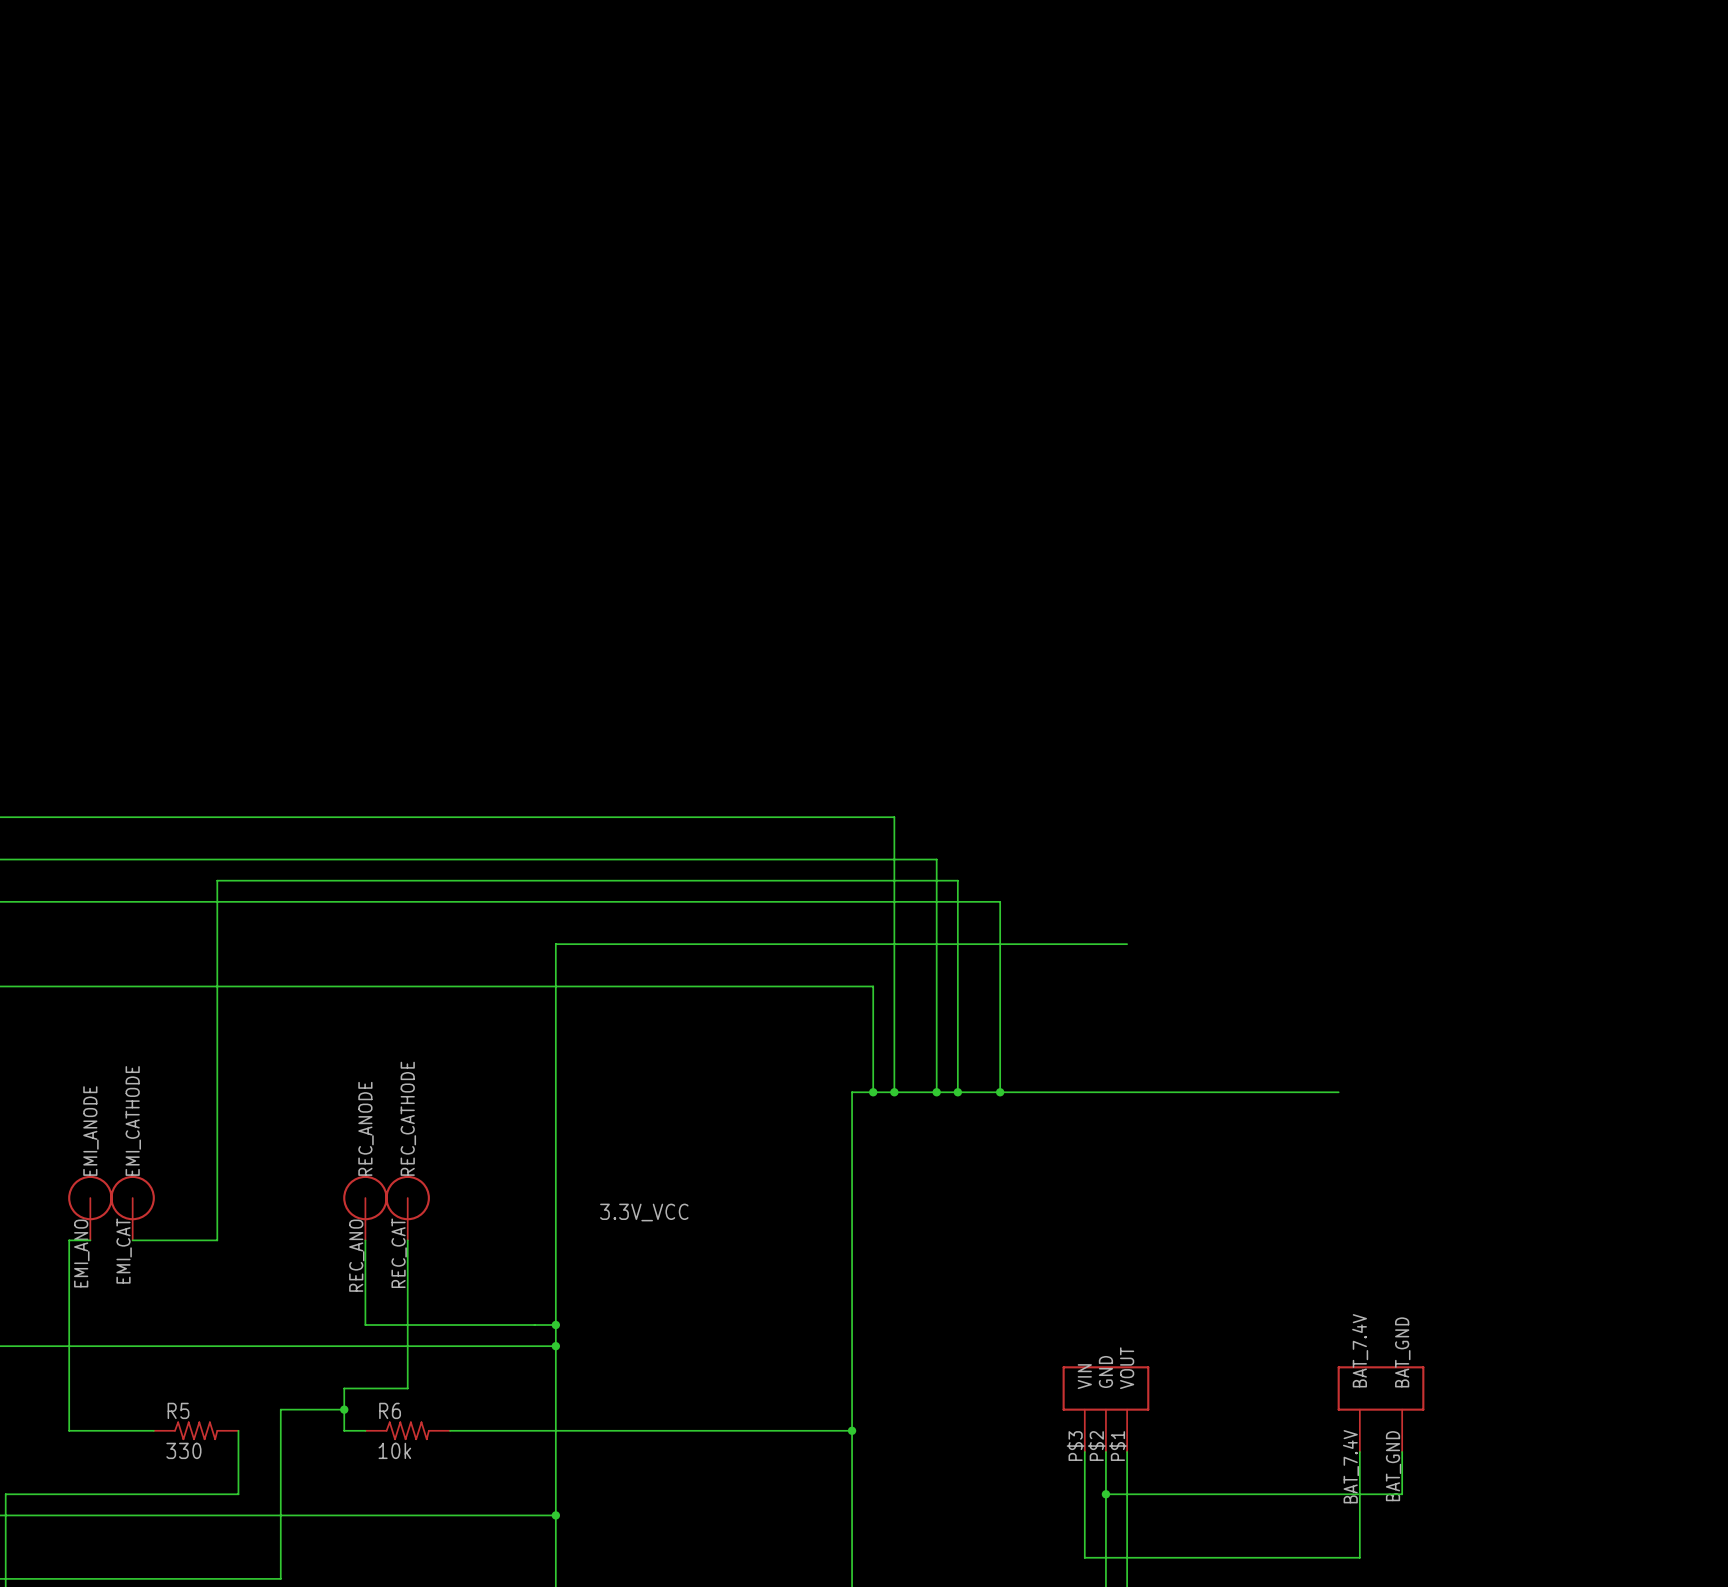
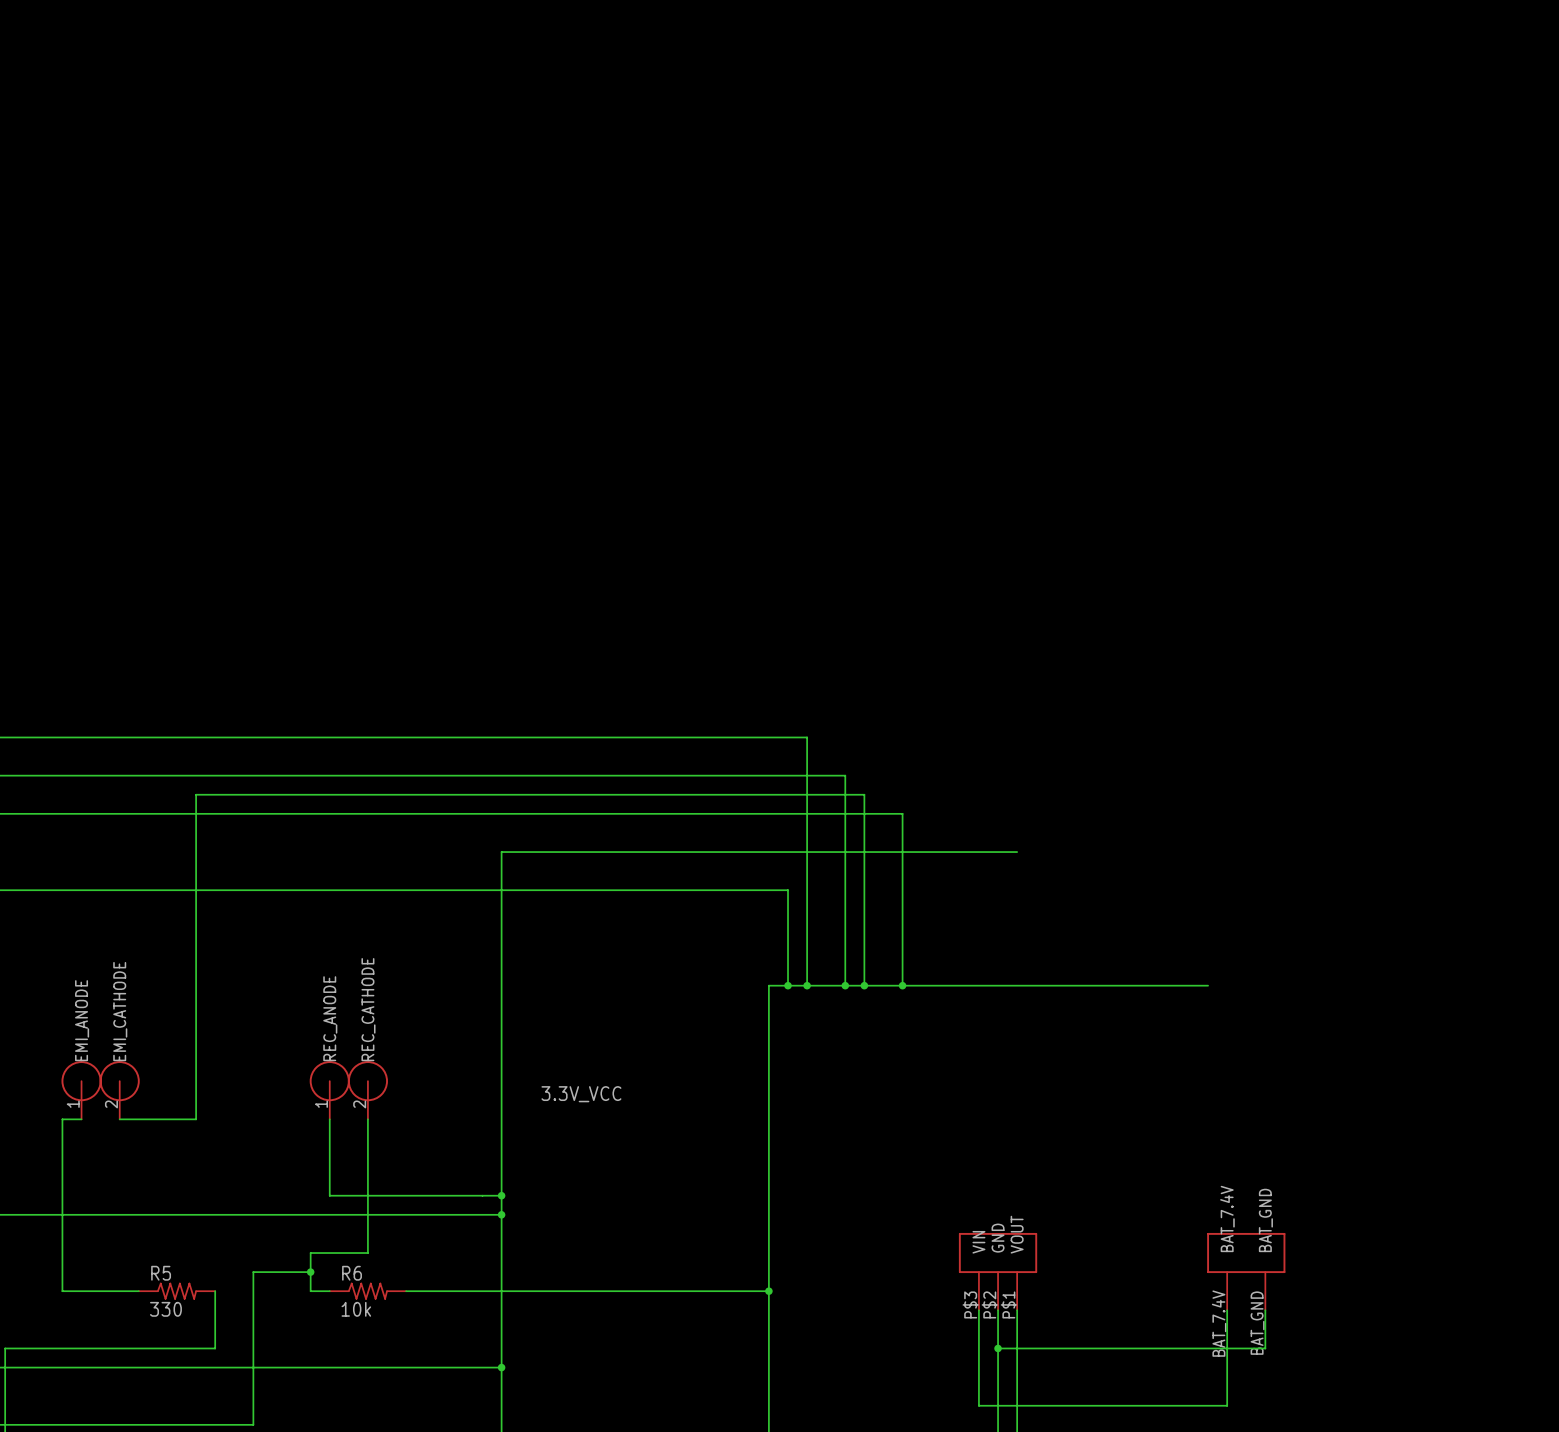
part pin number: EMI_CAT (124, 1251) -> 2 (111, 1104)
part pin number: EMI_ANO (81, 1253) -> 1 (73, 1104)
part pin number: REC_CAT (399, 1253) -> 2 (359, 1104)
part pin number: REC_ANO (356, 1255) -> 1 (321, 1104)

